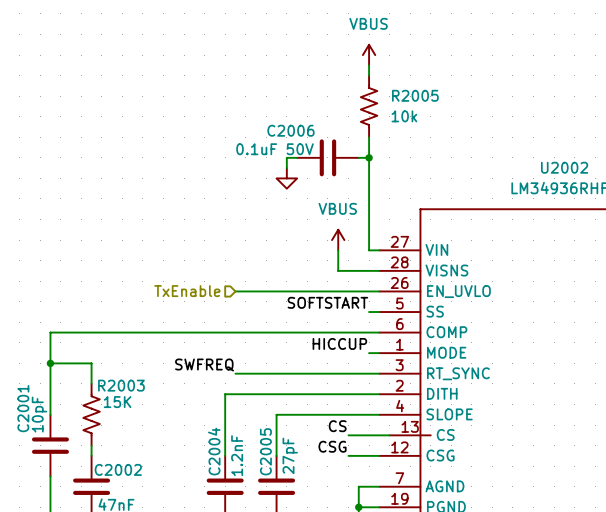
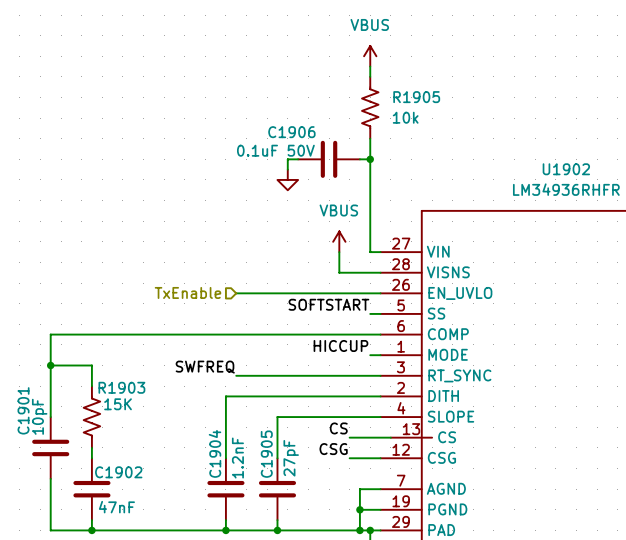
R2005 name: R2005 (415, 95) -> R1905 (416, 97)
C2006 name: C2006 (290, 130) -> C1906 (291, 132)
U2002 name: U2002 (564, 167) -> U1902 (566, 169)
R2003 name: R2003 (121, 385) -> R1903 (121, 387)
C2001 name: C2001 (23, 408) -> C1901 (23, 410)
C2004 name: C2004 (214, 451) -> C1904 (215, 453)
C2005 name: C2005 (265, 451) -> C1905 (266, 454)
C2002 name: C2002 (118, 469) -> C1902 (118, 472)

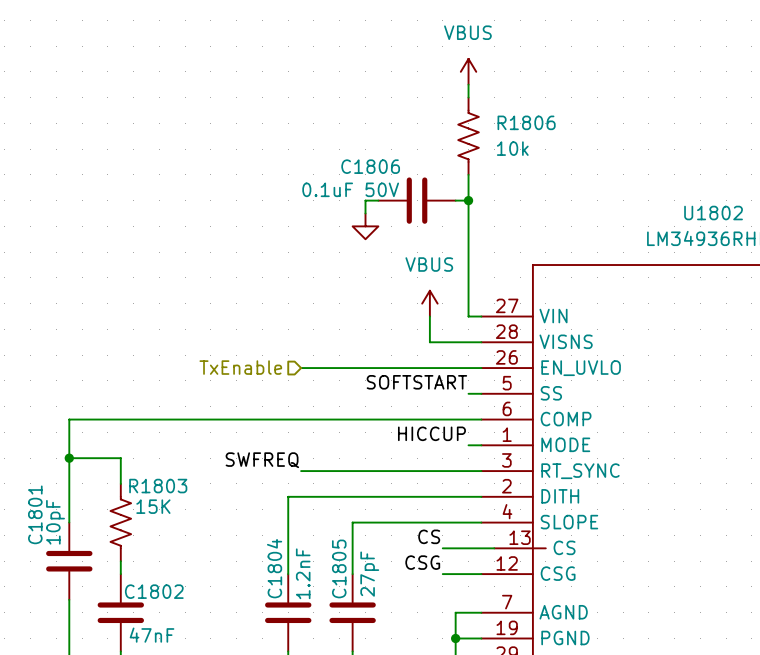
R1905 name: R1905 (416, 97) -> R1806 (526, 122)
C1906 name: C1906 (291, 132) -> C1806 (370, 166)
U1902 name: U1902 (566, 169) -> U1802 (713, 213)
R1903 name: R1903 (121, 387) -> R1803 (158, 486)
C1901 name: C1901 (23, 410) -> C1801 (35, 514)
C1904 name: C1904 (215, 453) -> C1804 (274, 568)
C1905 name: C1905 (266, 454) -> C1805 (339, 568)
C1902 name: C1902 (118, 472) -> C1802 (154, 591)

